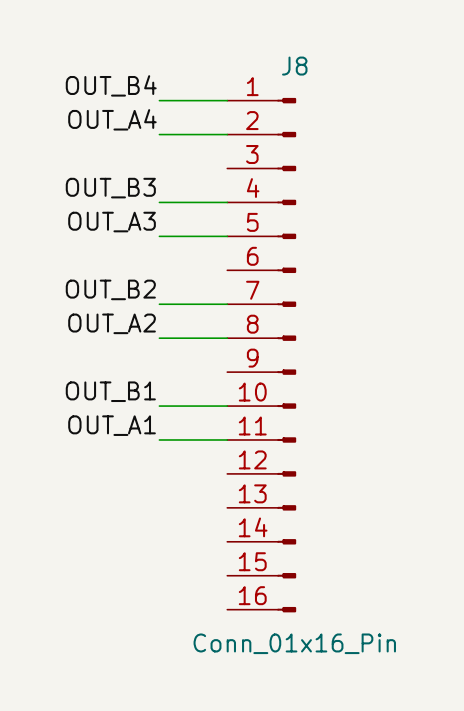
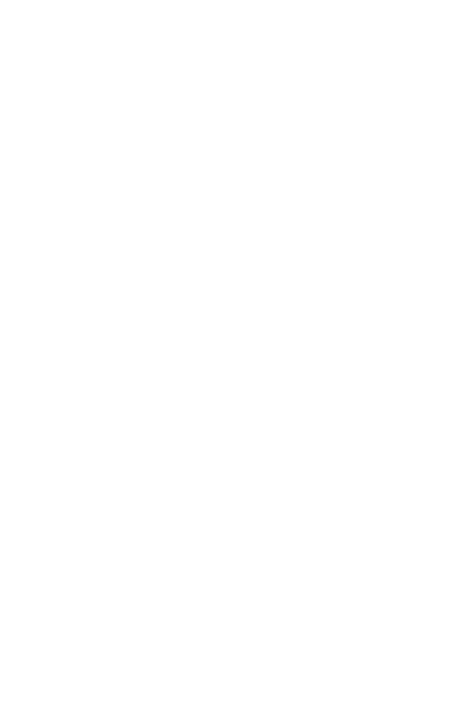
label: OUT_B4 (111, 85) -> none
wire: (159, 100) (227, 100) -> none
label: OUT_A4 (112, 119) -> none
wire: (159, 134) (227, 134) -> none
label: OUT_B3 (110, 188) -> none
wire: (159, 202) (227, 202) -> none
label: OUT_A3 (112, 222) -> none
wire: (159, 236) (227, 236) -> none
label: OUT_B2 (110, 289) -> none
wire: (159, 304) (227, 304) -> none
label: OUT_A2 (112, 323) -> none
wire: (159, 338) (227, 338) -> none
J8: Conn_01x16_Pin (261, 355) -> none
label: OUT_B1 (110, 391) -> none
wire: (159, 406) (227, 406) -> none
label: OUT_A1 (112, 425) -> none
wire: (159, 439) (227, 439) -> none

